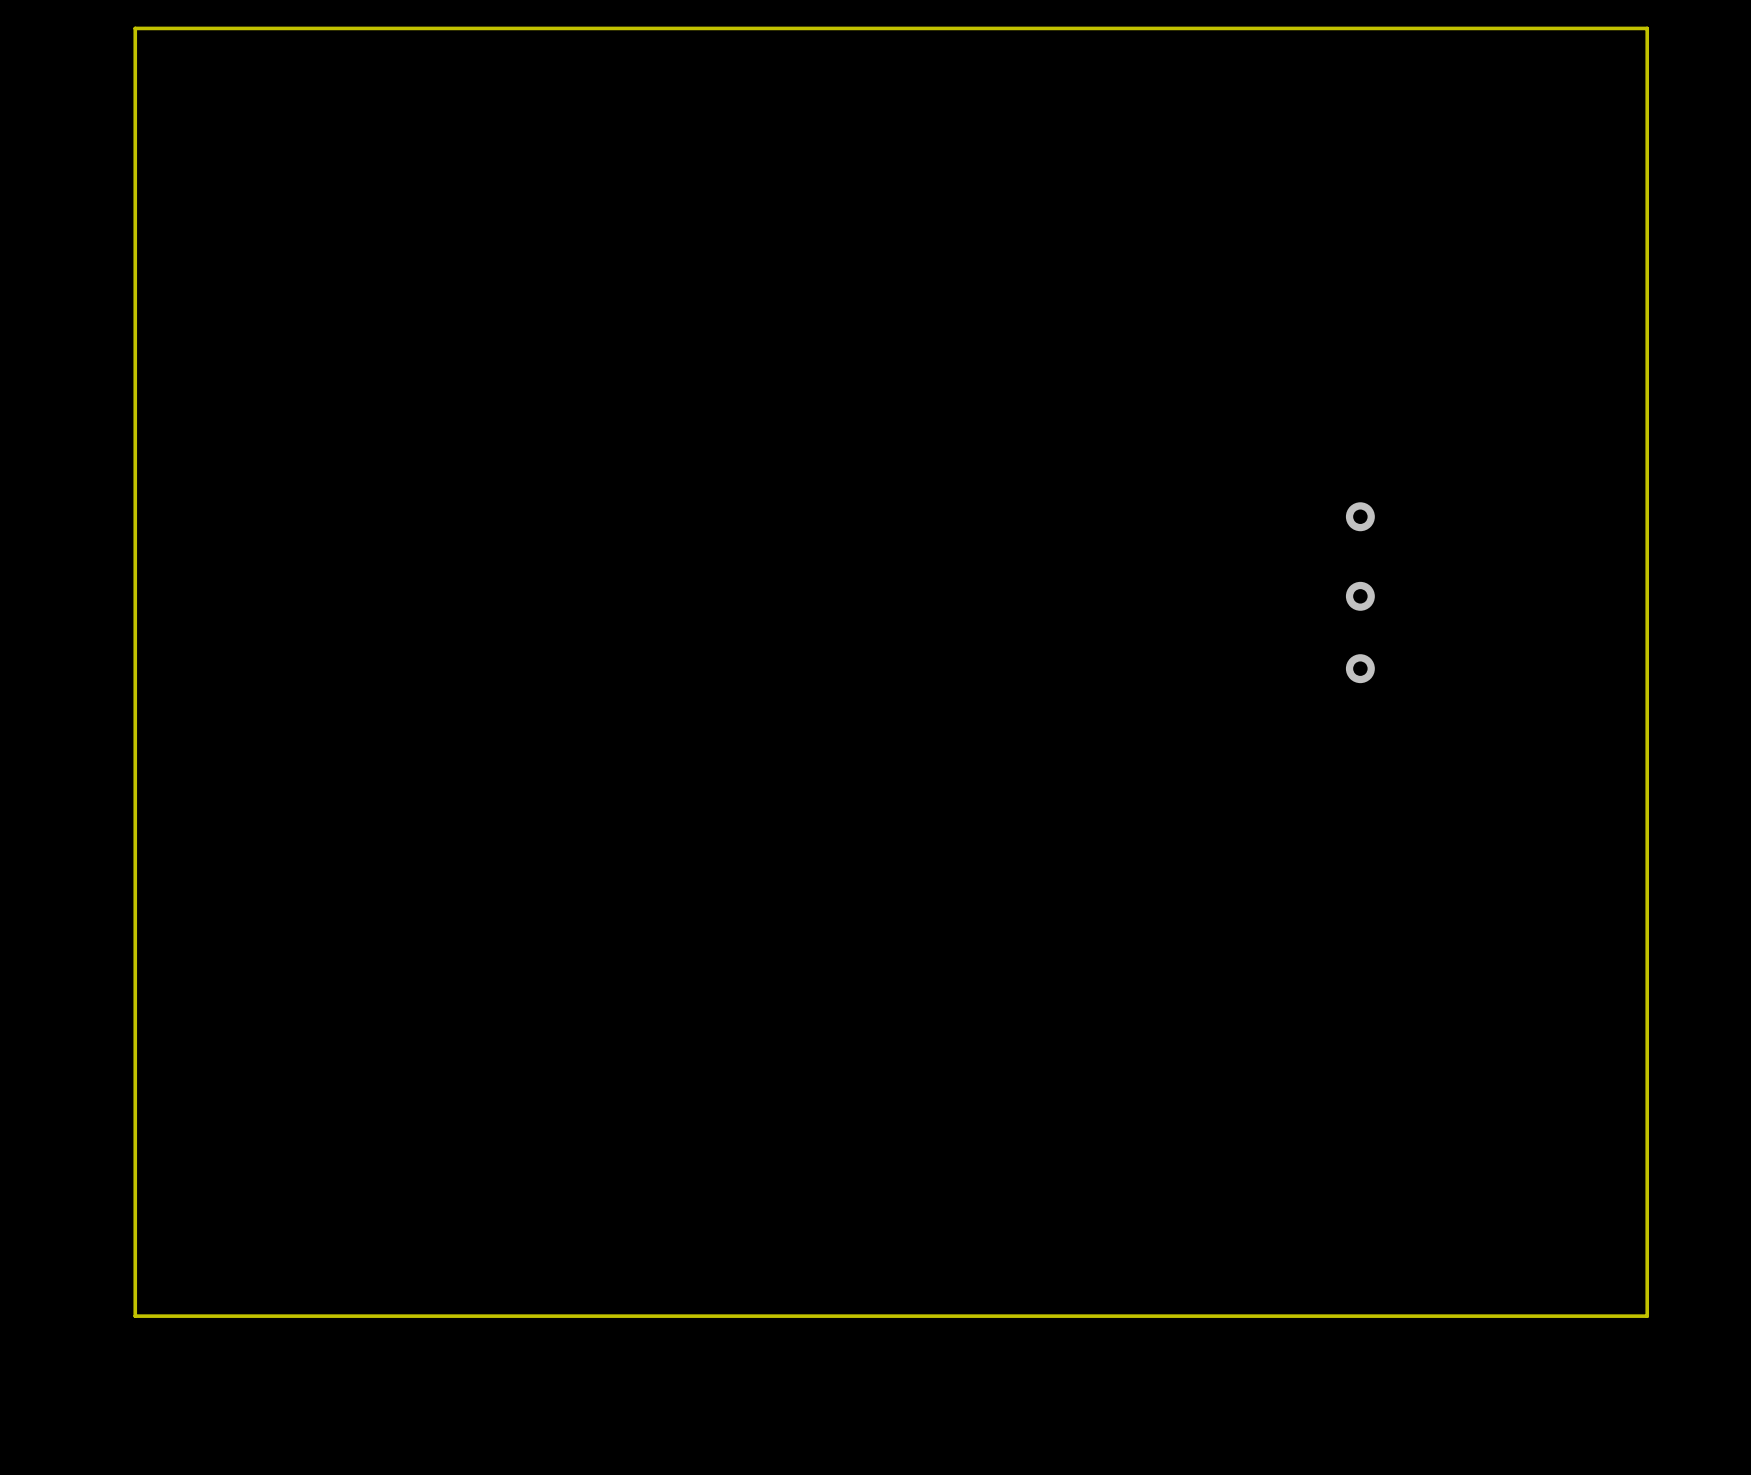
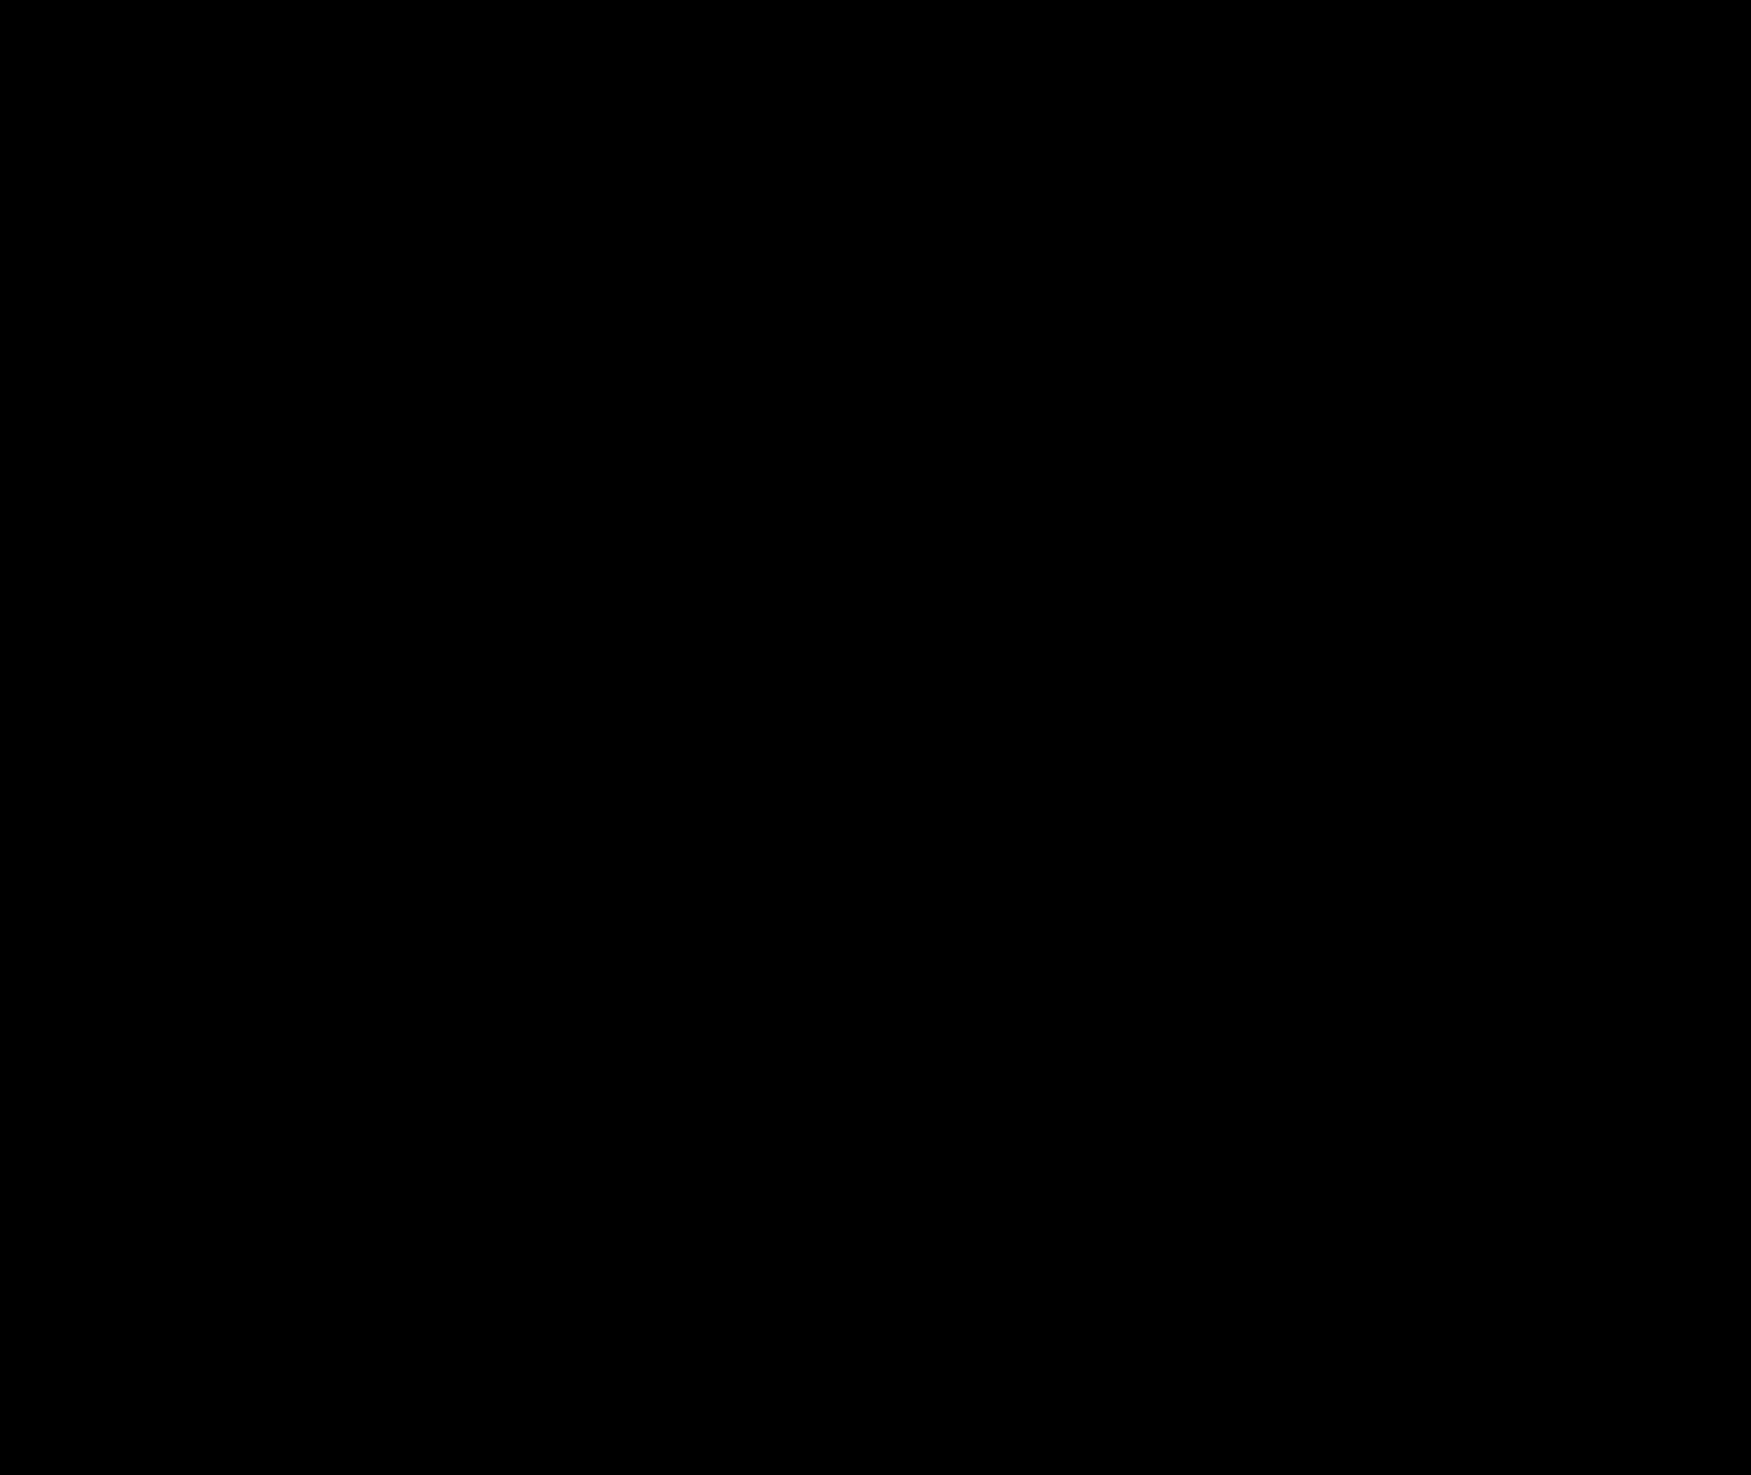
board edge: (1647, 28) (135, 28) (135, 1316) (1647, 1316) (1647, 28) -> none
via: (1360, 516) -> none
via: (1360, 596) -> none
via: (1360, 668) -> none

